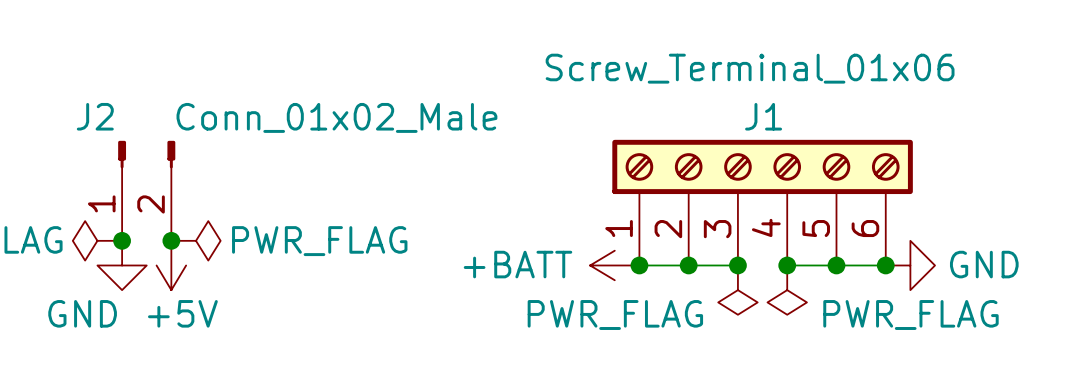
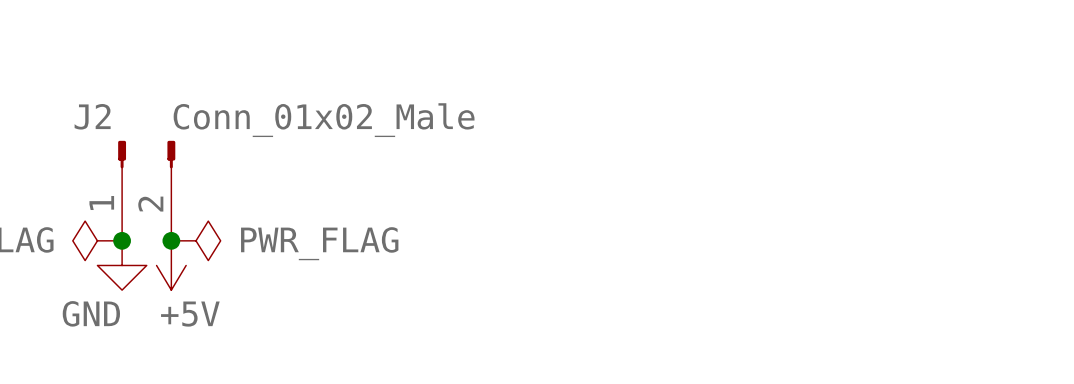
J1: Screw_Terminal_01x06 (762, 202) -> none
power symbol: +BATT (614, 265) -> none
wire: (639, 265) (737, 265) -> none
junction: (639, 265) -> none
junction: (688, 265) -> none
junction: (737, 265) -> none
wire: (787, 265) (885, 265) -> none
junction: (787, 265) -> none
junction: (836, 265) -> none
junction: (885, 265) -> none
power symbol: GND (910, 265) -> none
power symbol: PWR_FLAG (737, 290) -> none
power symbol: PWR_FLAG (787, 290) -> none

